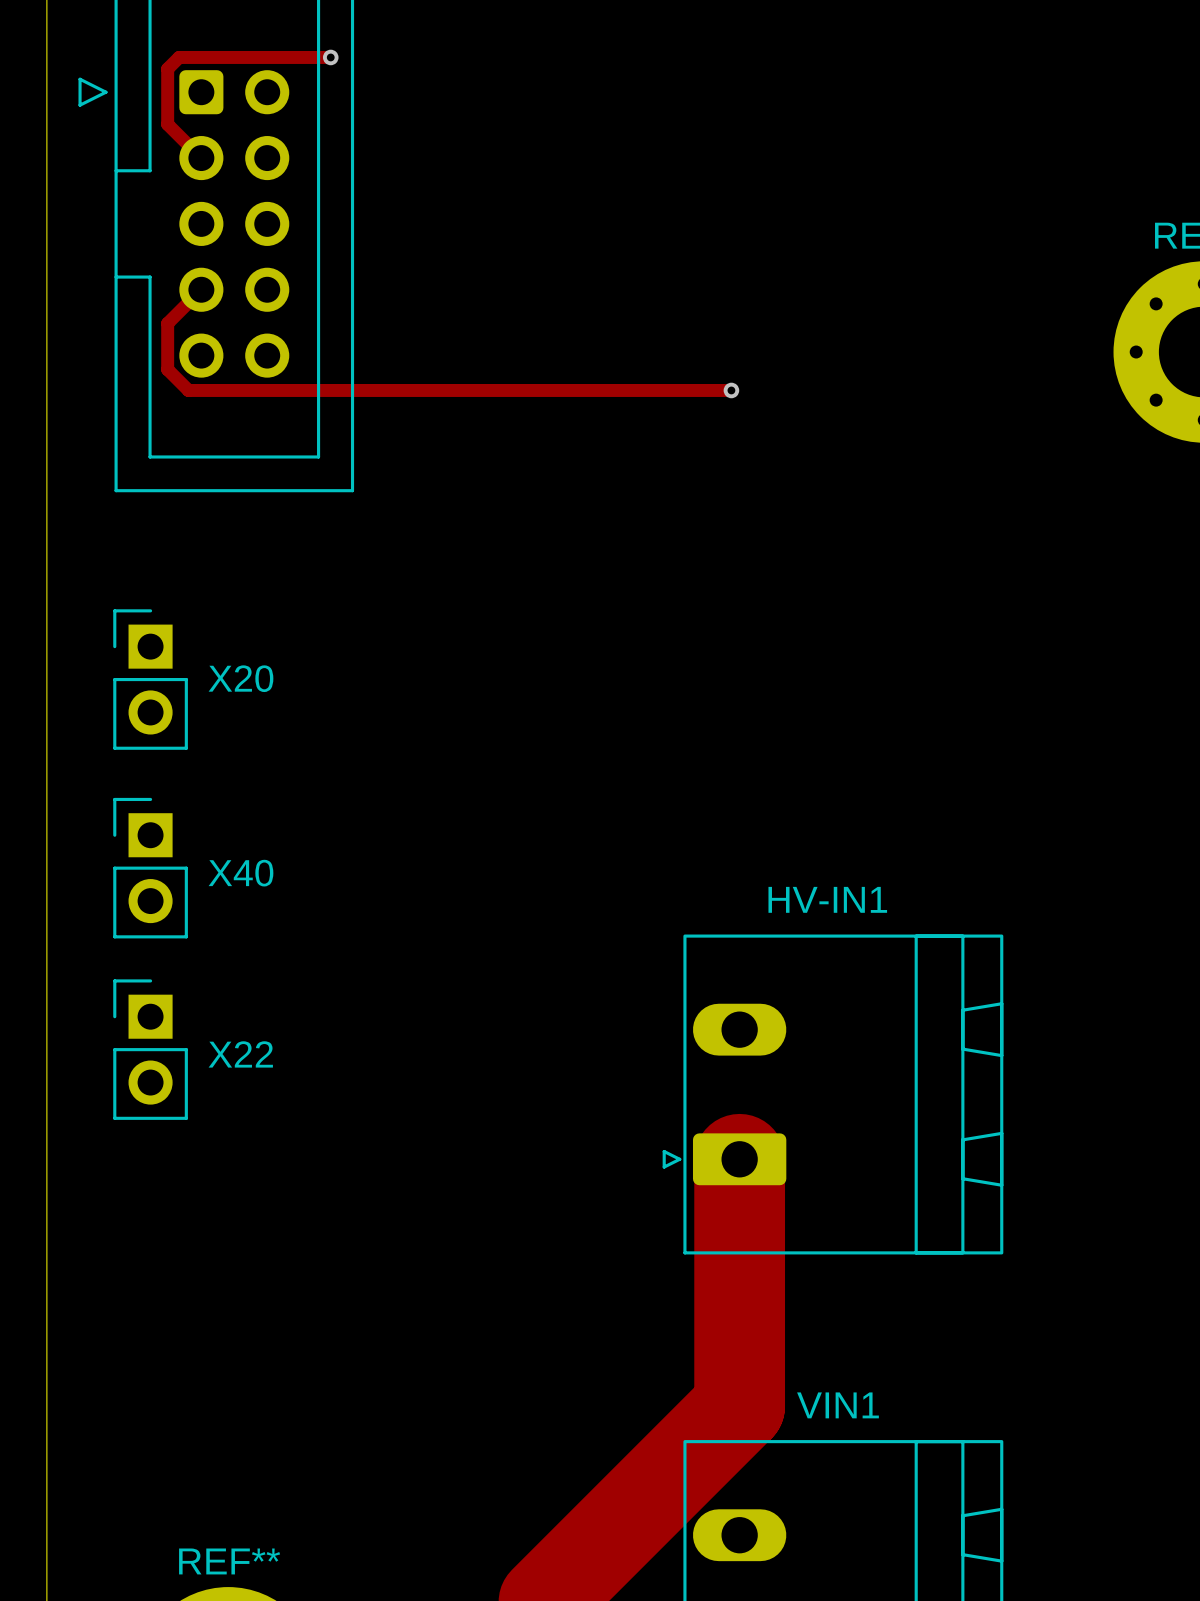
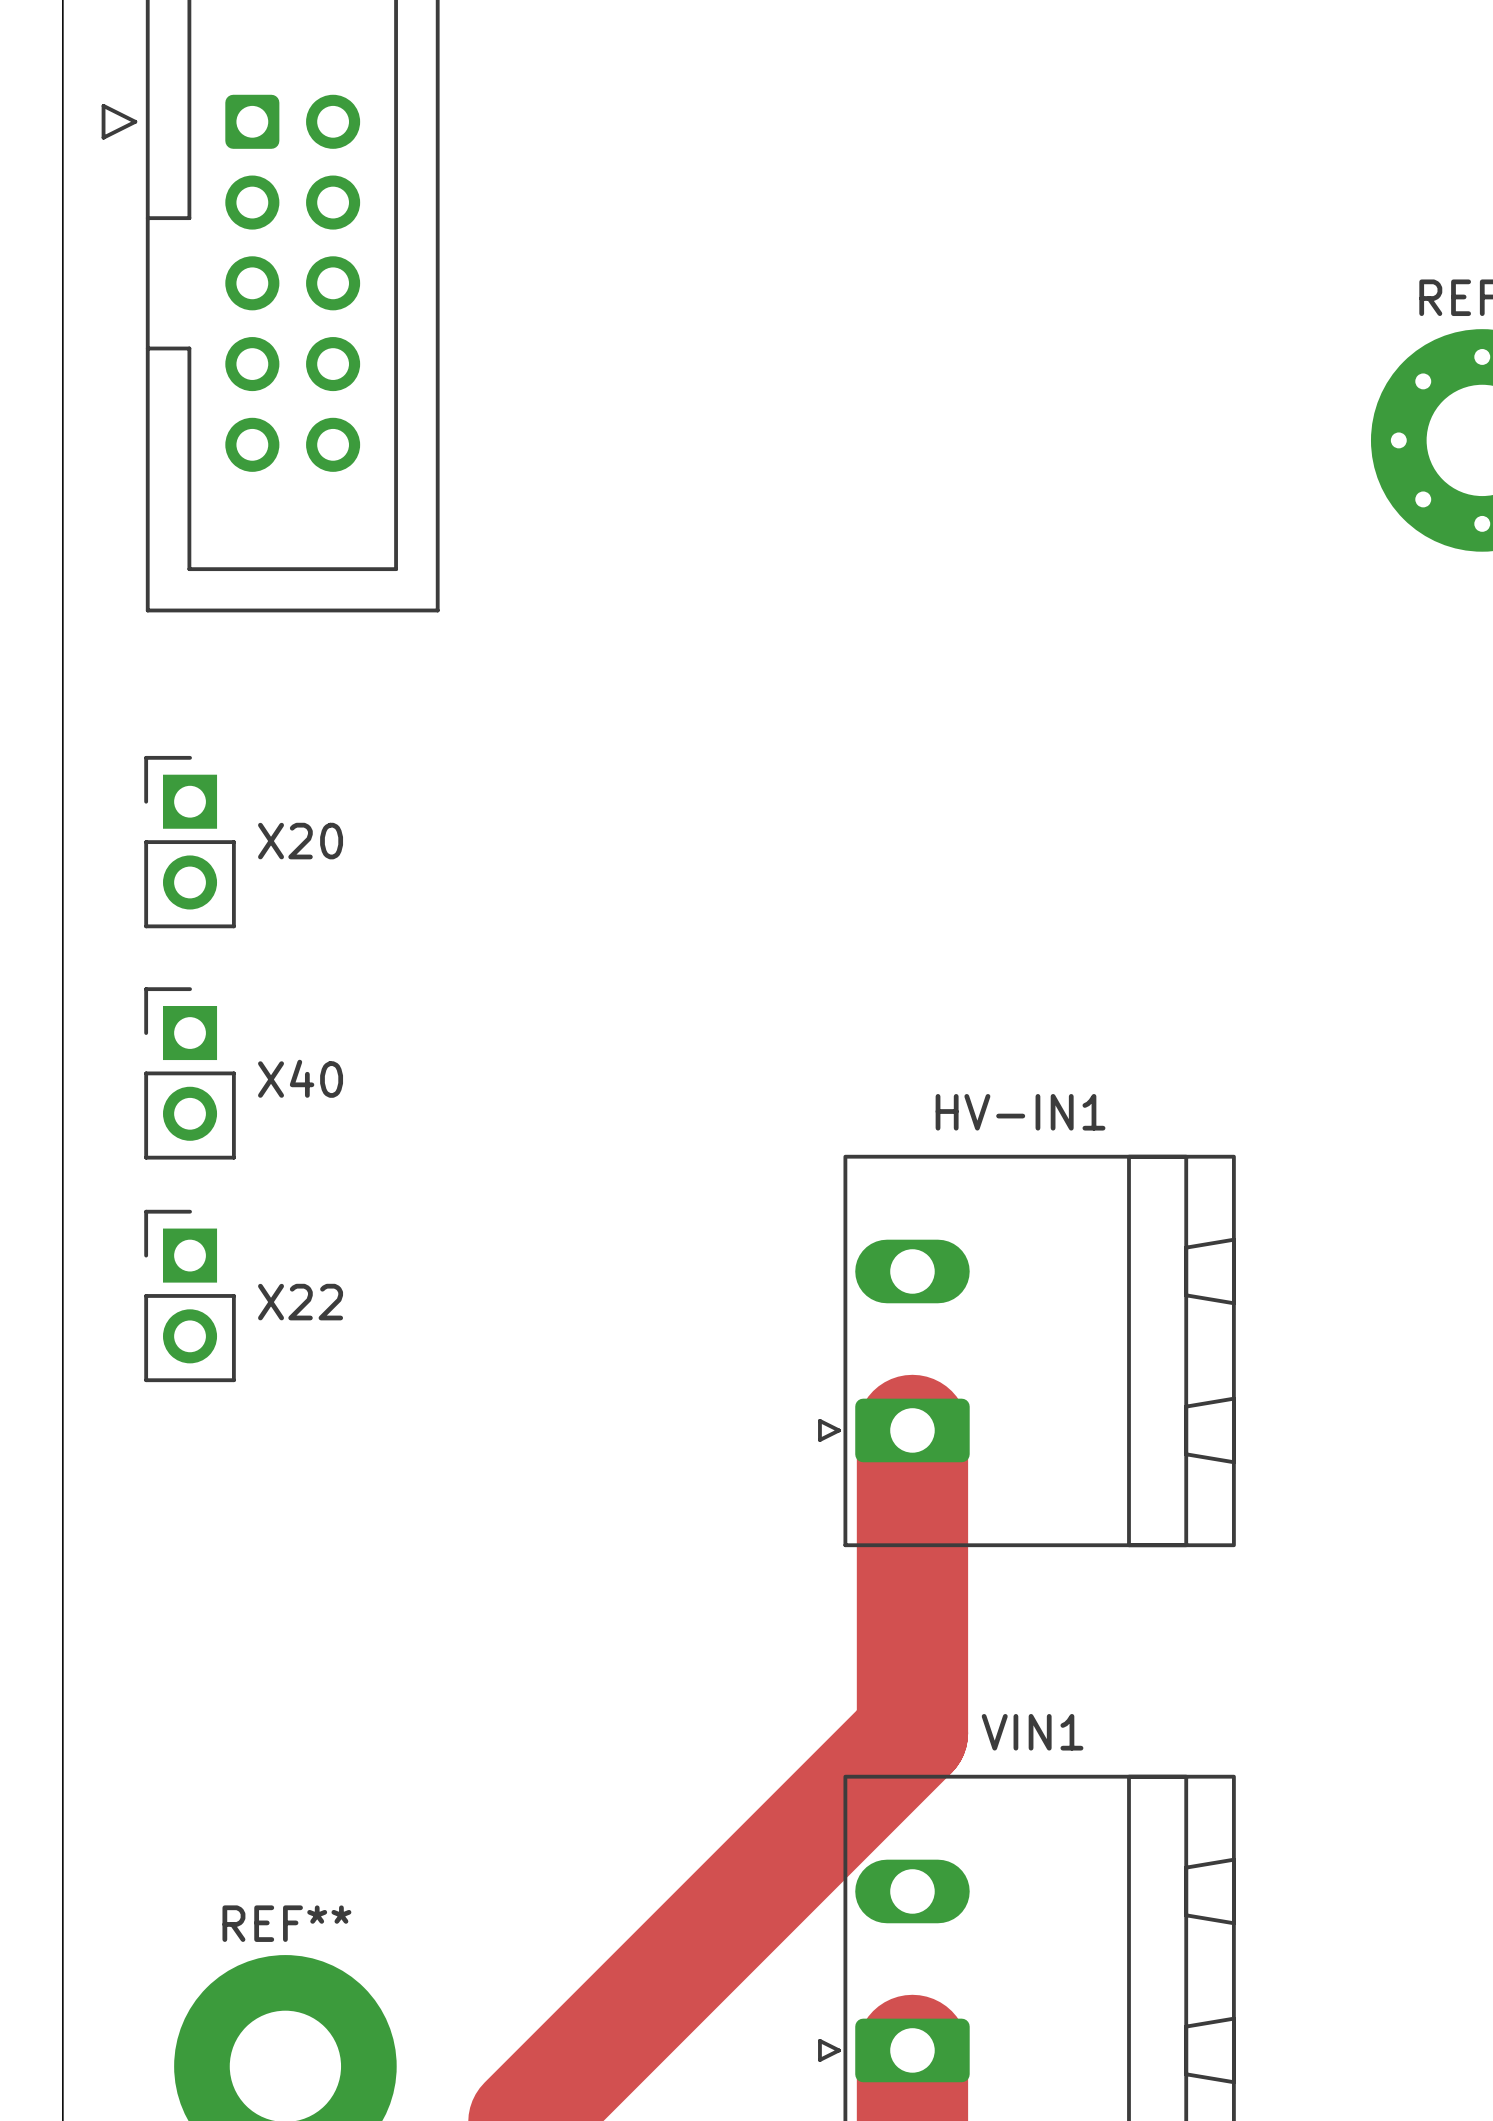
track: (330, 57) (179, 57) (167, 68) (167, 124) (201, 158) -> none
via: (330, 57) -> none
track: (201, 289) (167, 323) (167, 369) (188, 390) (731, 390) -> none
via: (731, 390) -> none

